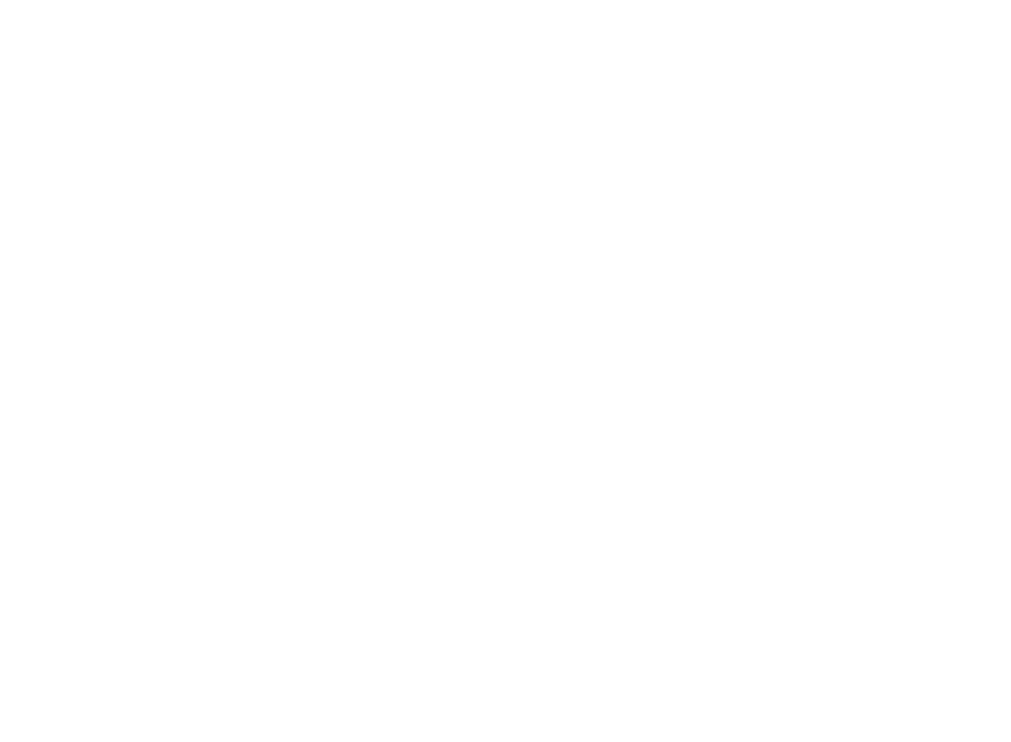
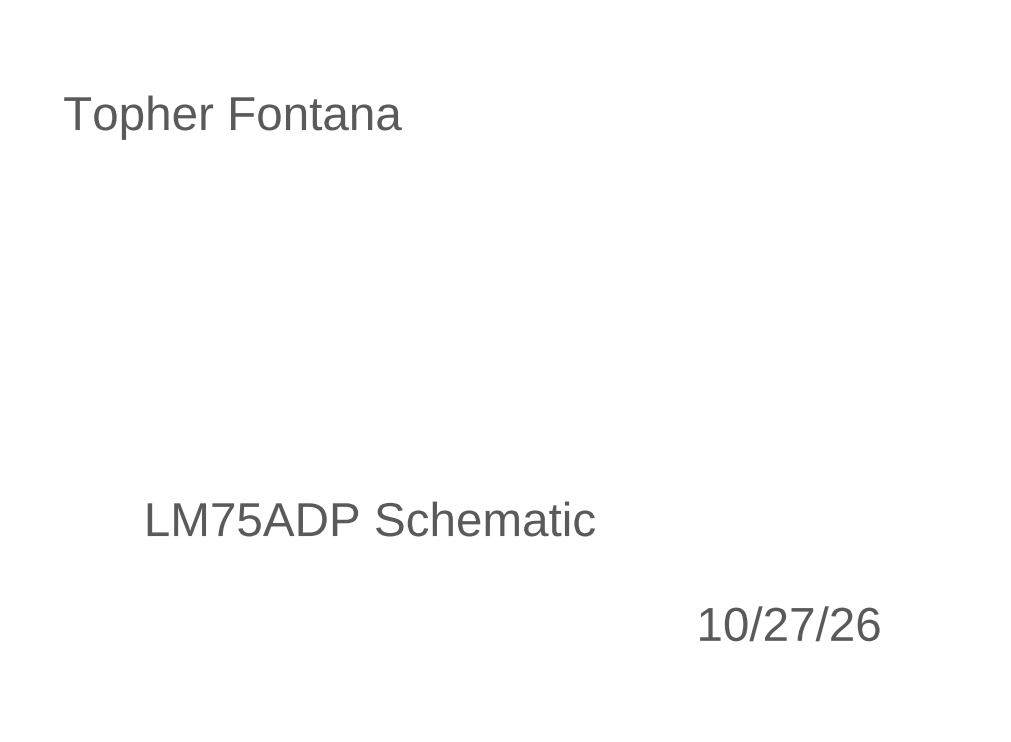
text: none -> Topher Fontana (232, 117)
text: none -> LM75ADP Schematic (371, 519)
text: none -> 10/27/26 (789, 623)

